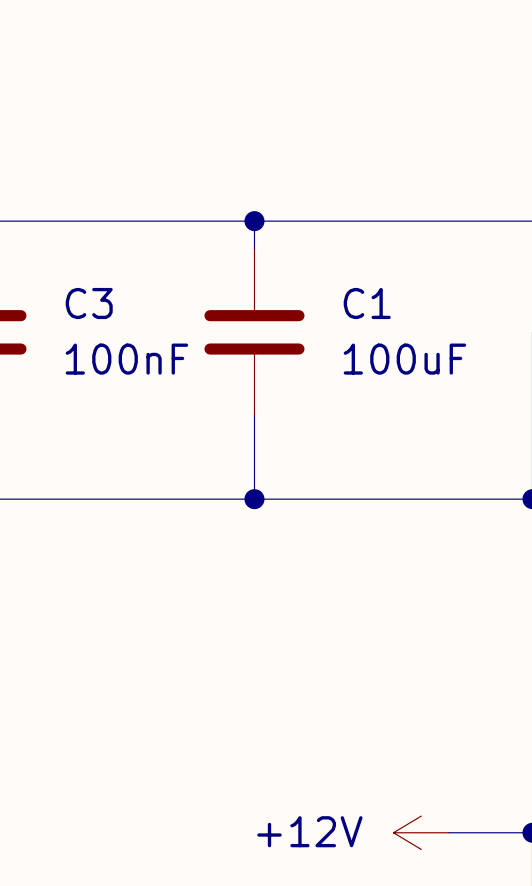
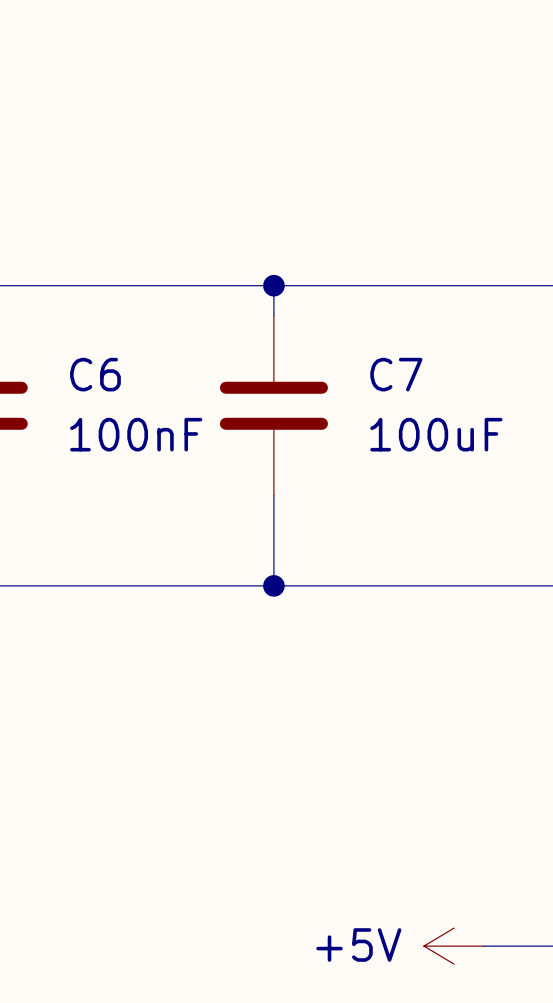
C3 name: C3 (89, 303) -> C6 (95, 374)
C1 name: C1 (367, 303) -> C7 (396, 374)
power symbol: +12V (421, 832) -> +5V (454, 946)

